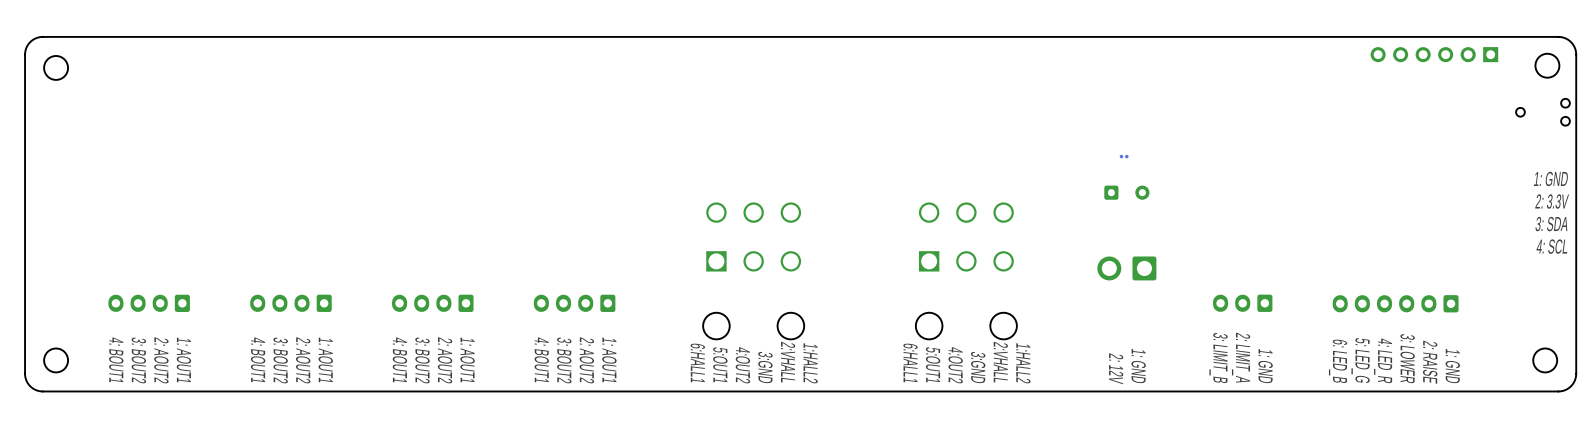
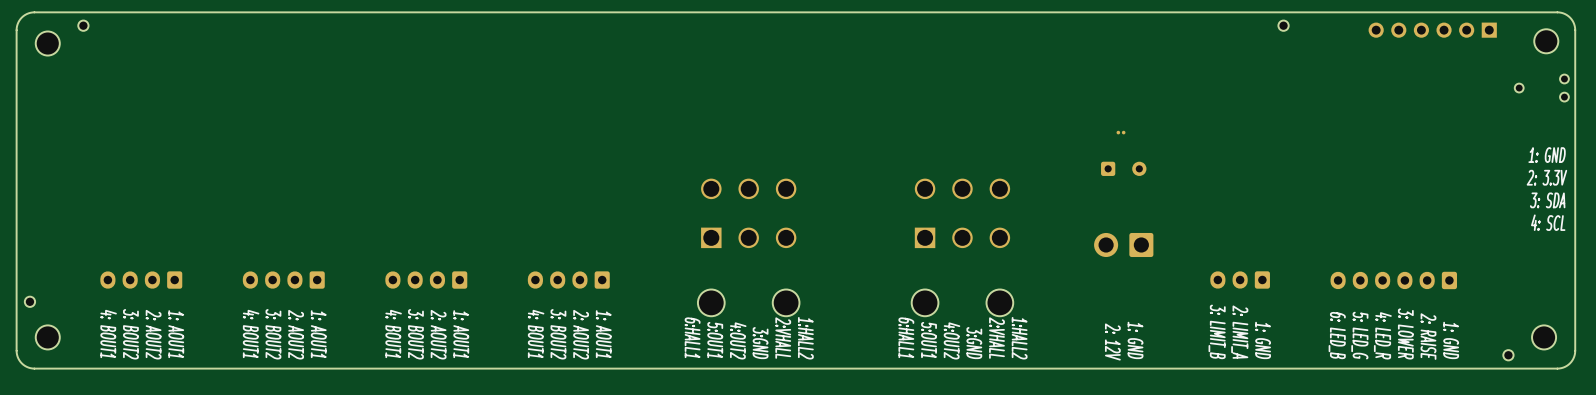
part: none -> (83, 25)
part: none -> (1283, 25)
part: none -> (29, 301)
part: none -> (1508, 355)

